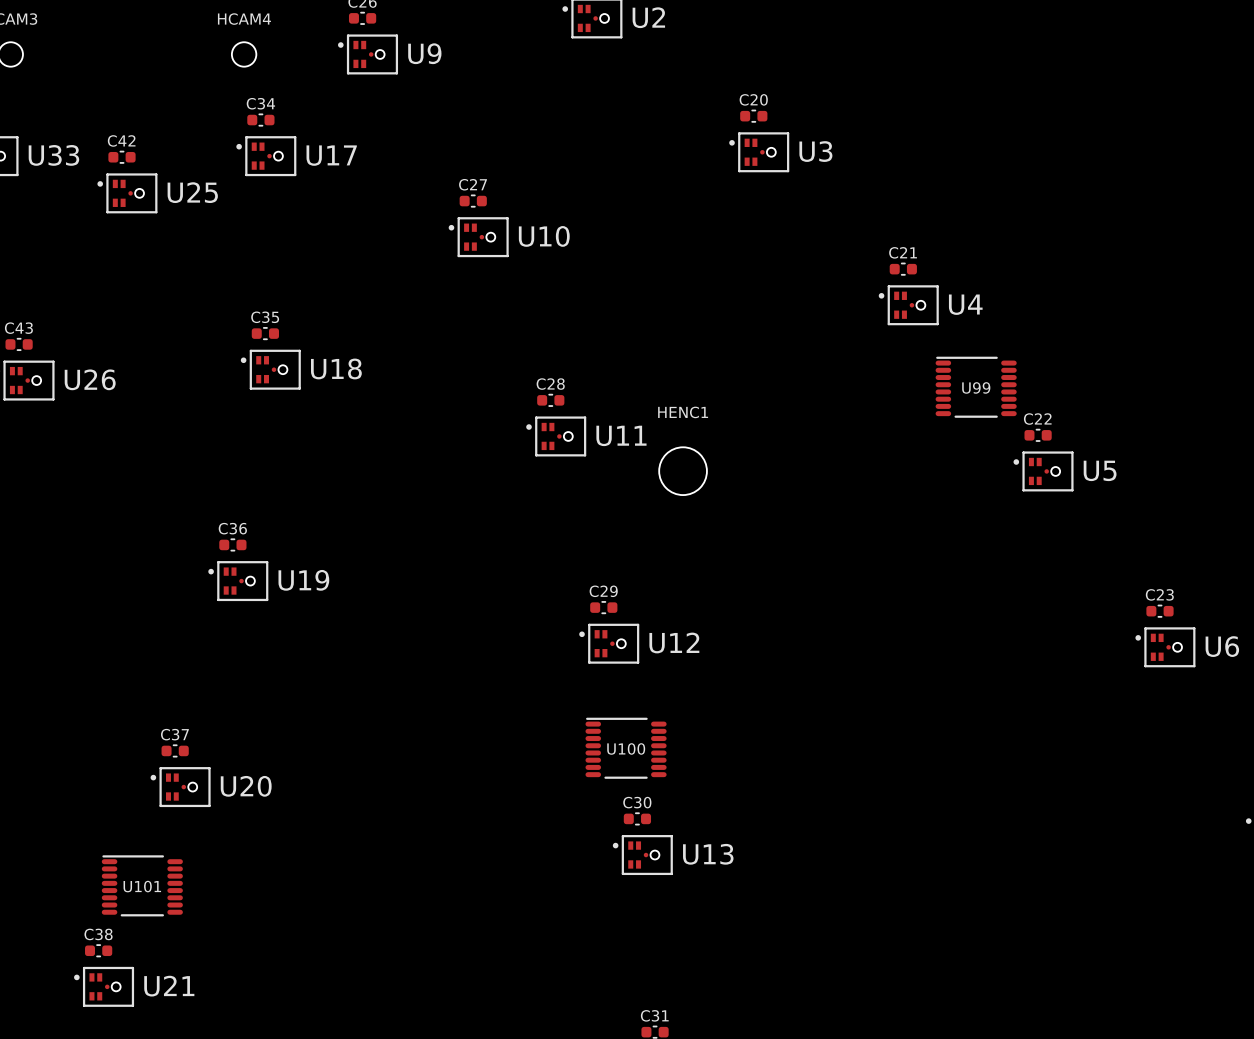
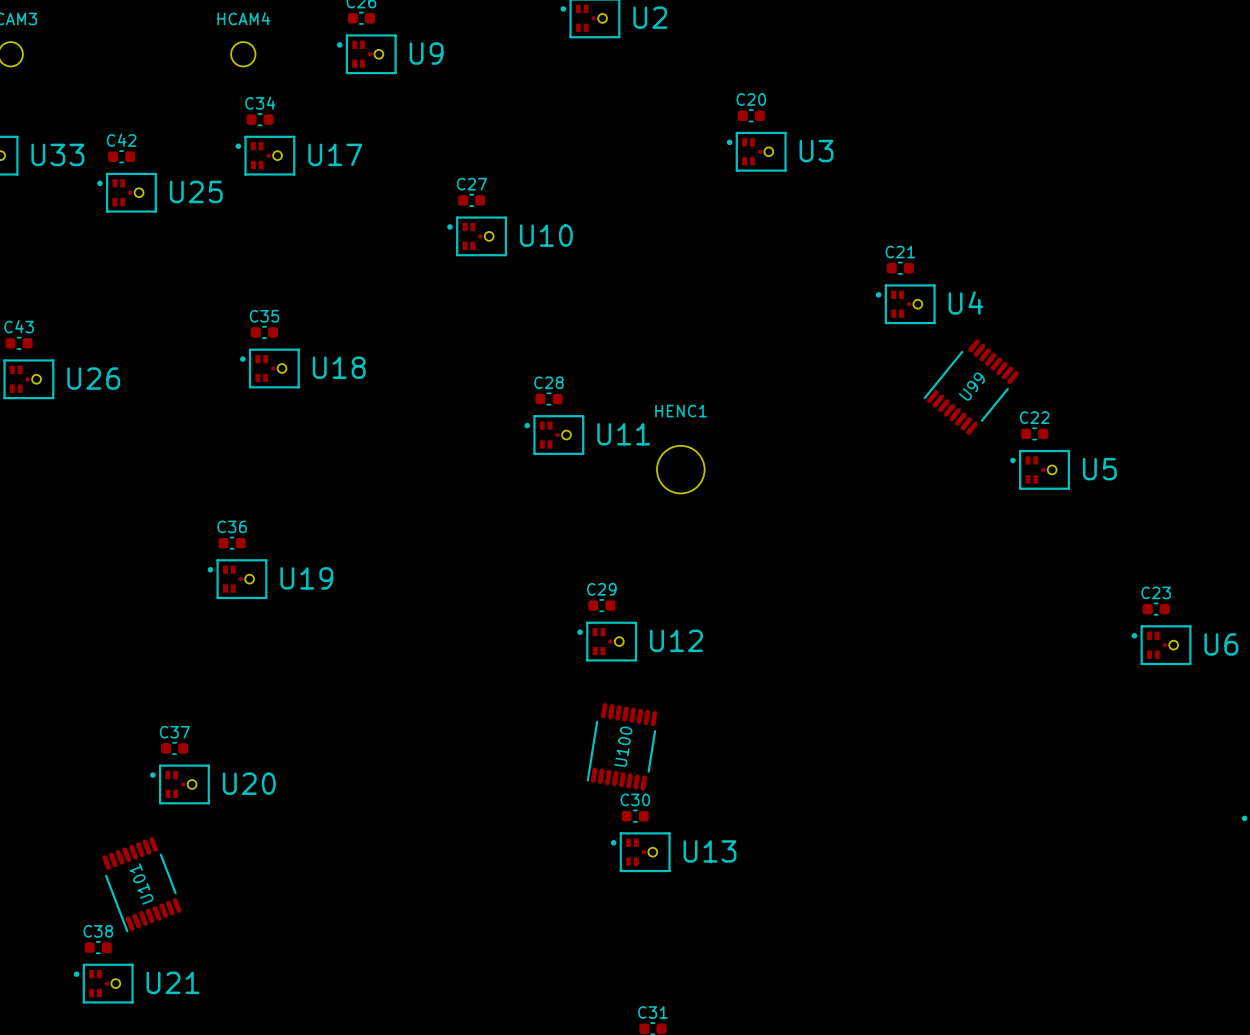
U99 rotation: 0° (976, 387) -> 51° counterclockwise (971, 387)
U100 rotation: 0° (626, 748) -> 81° counterclockwise (622, 746)
U101 rotation: 0° (142, 885) -> 111° counterclockwise (141, 884)

